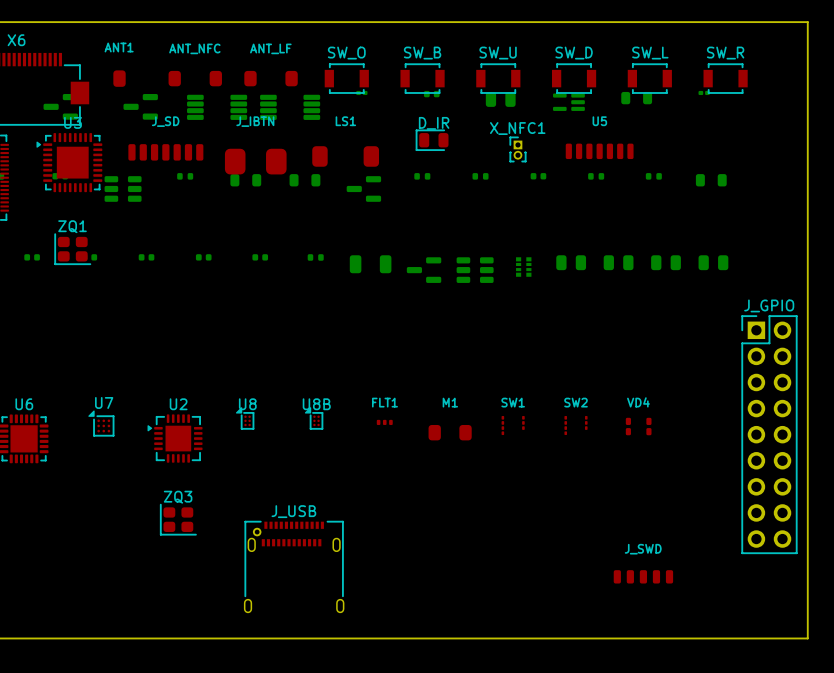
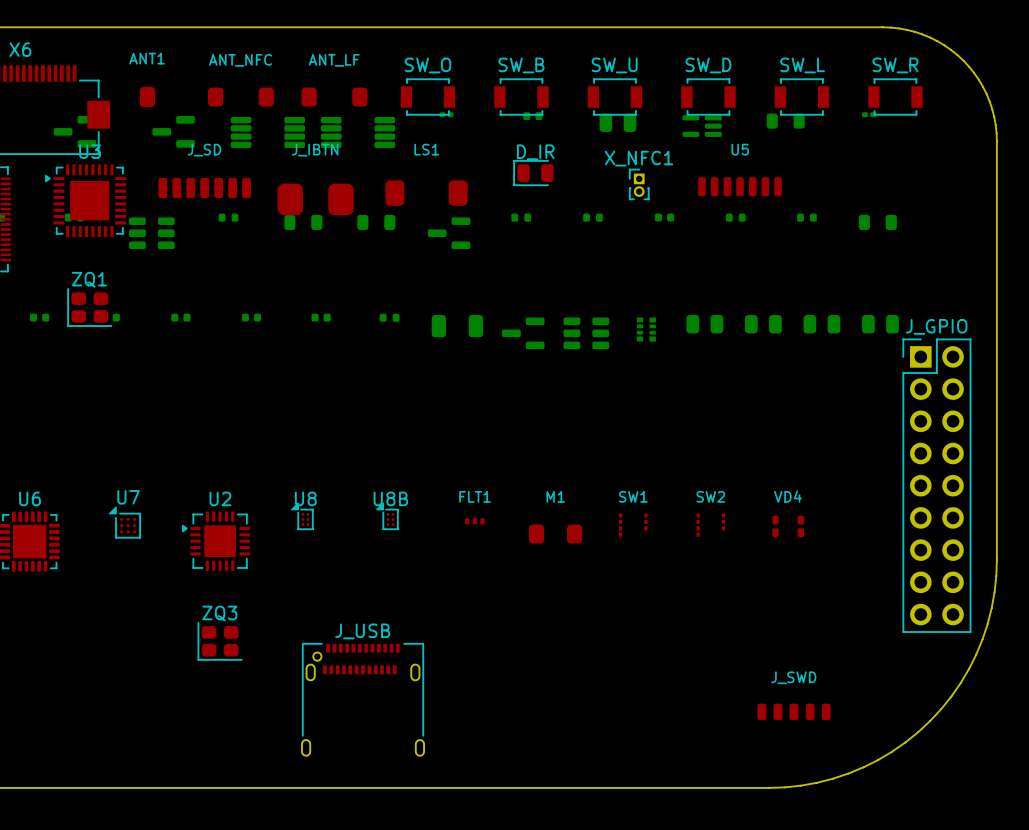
board edge: (715, 22) (807, 22) (807, 114) -> (882, 27) (907, 29) (922, 34) (944, 45) (963, 60) (978, 79) (989, 101) (994, 117) (996, 141)
J_GPIO position: (769, 434) -> (936, 485)
board edge: (807, 453) (807, 638) (622, 638) -> (996, 559) (991, 608) (982, 639) (960, 683) (930, 721) (892, 751) (848, 773) (817, 782) (768, 787)

